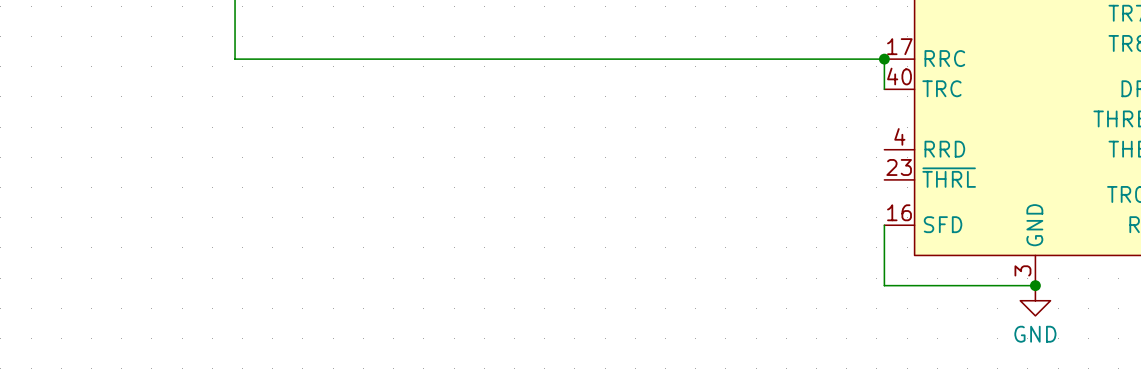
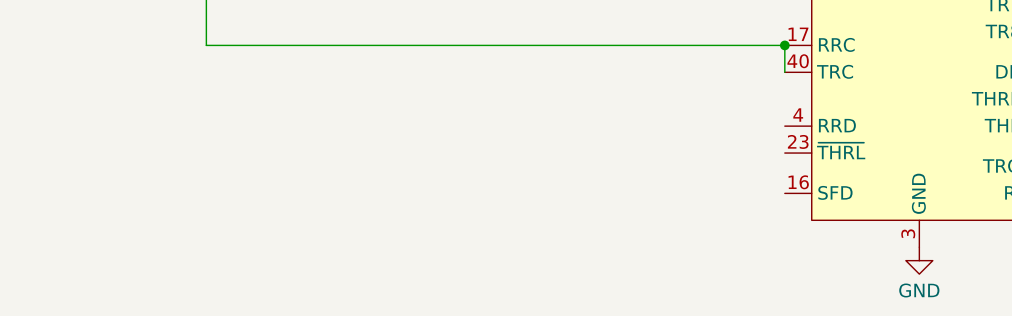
wire: (884, 225) (884, 285) (1035, 285) -> none
junction: (1035, 285) -> none

